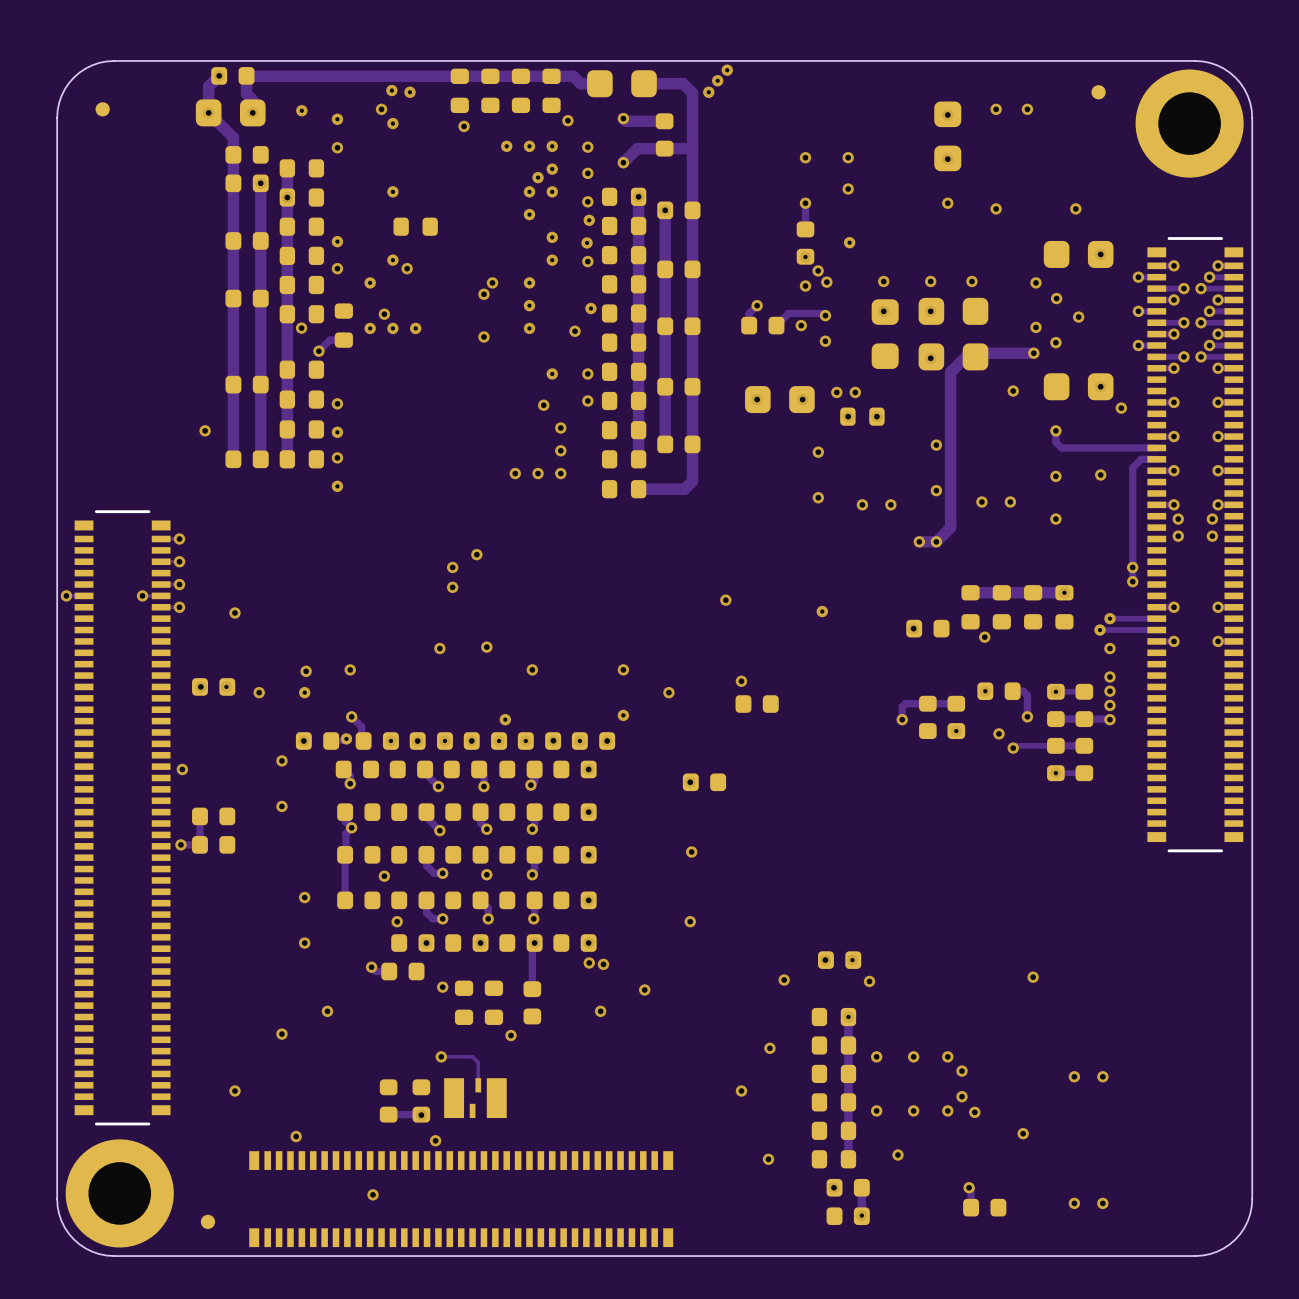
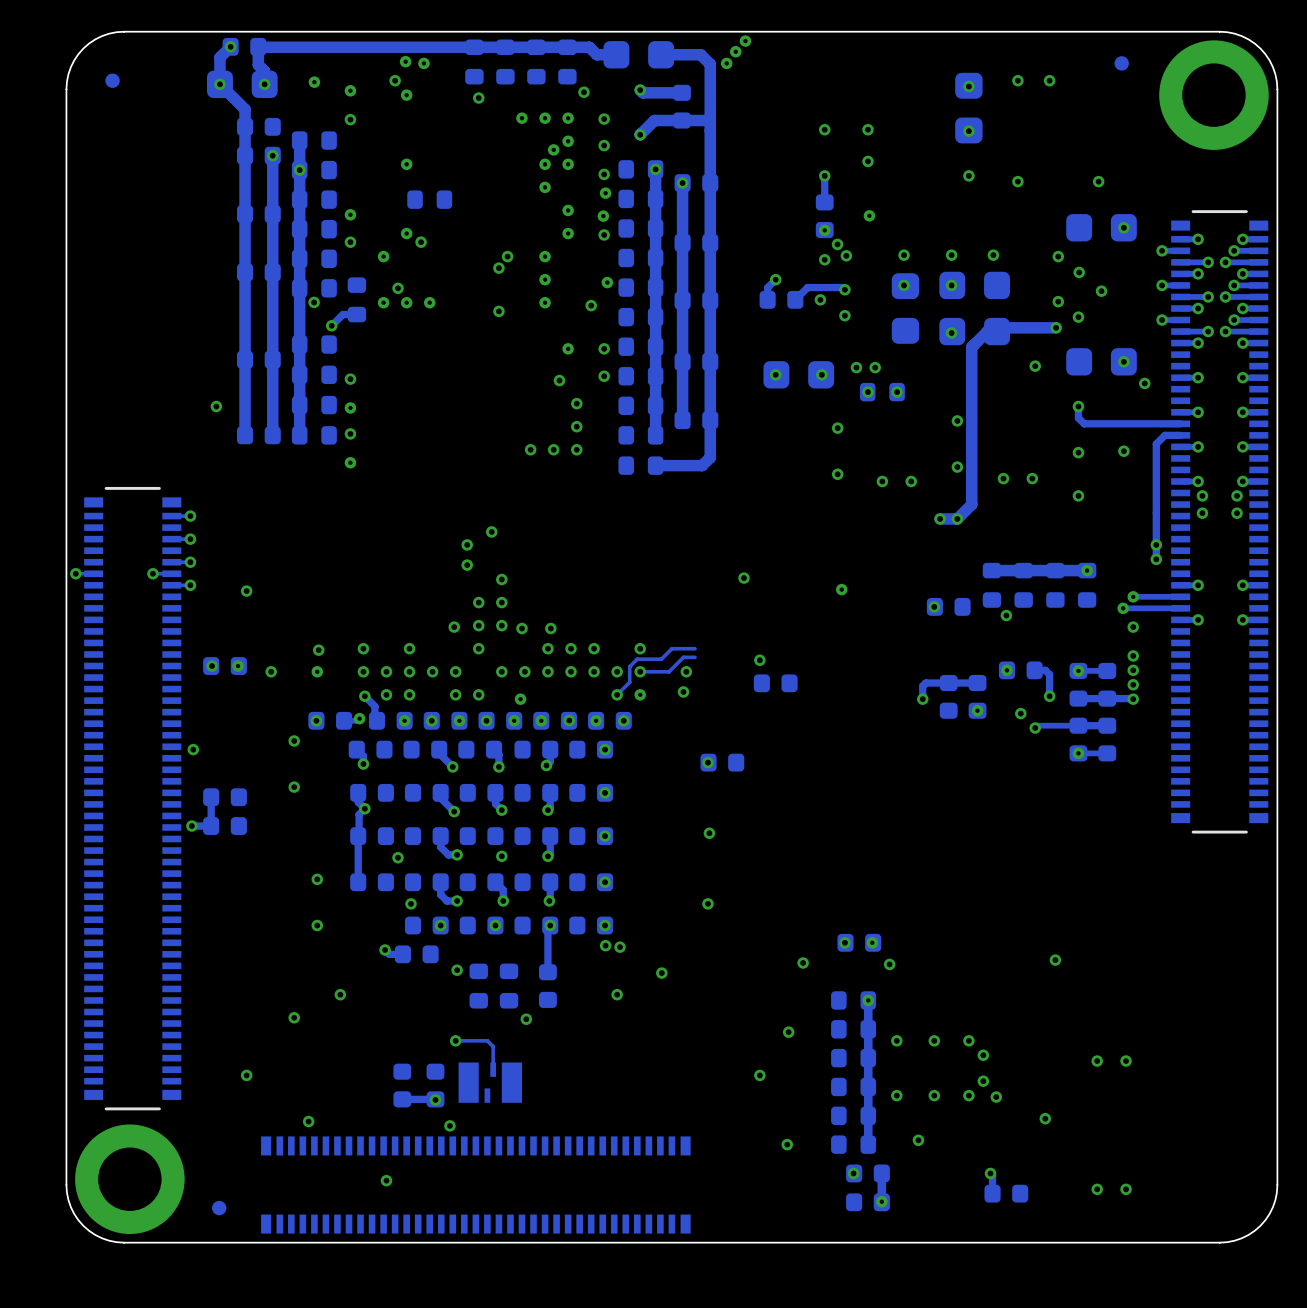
via: none -> (501, 579)
via: none -> (478, 602)
via: none -> (501, 602)
via: none -> (478, 625)
via: none -> (521, 628)
via: none -> (550, 628)
via: none -> (409, 648)
via: none -> (478, 648)
via: none -> (571, 648)
via: none -> (594, 648)
track: none -> (694, 648) (671, 648) (661, 659) (637, 659) (629, 666) (629, 682) (617, 694)
track: none -> (694, 657) (683, 657) (669, 671) (640, 671)
via: none -> (363, 671)
via: none -> (386, 671)
via: none -> (409, 671)
via: none -> (432, 671)
via: none -> (455, 671)
via: none -> (501, 671)
via: none -> (524, 671)
via: none -> (547, 671)
via: none -> (571, 671)
via: none -> (594, 671)
via: none -> (617, 671)
via: none -> (640, 671)
via: none -> (683, 691)
via: none -> (386, 694)
via: none -> (409, 694)
via: none -> (455, 694)
via: none -> (478, 694)
via: none -> (617, 694)

